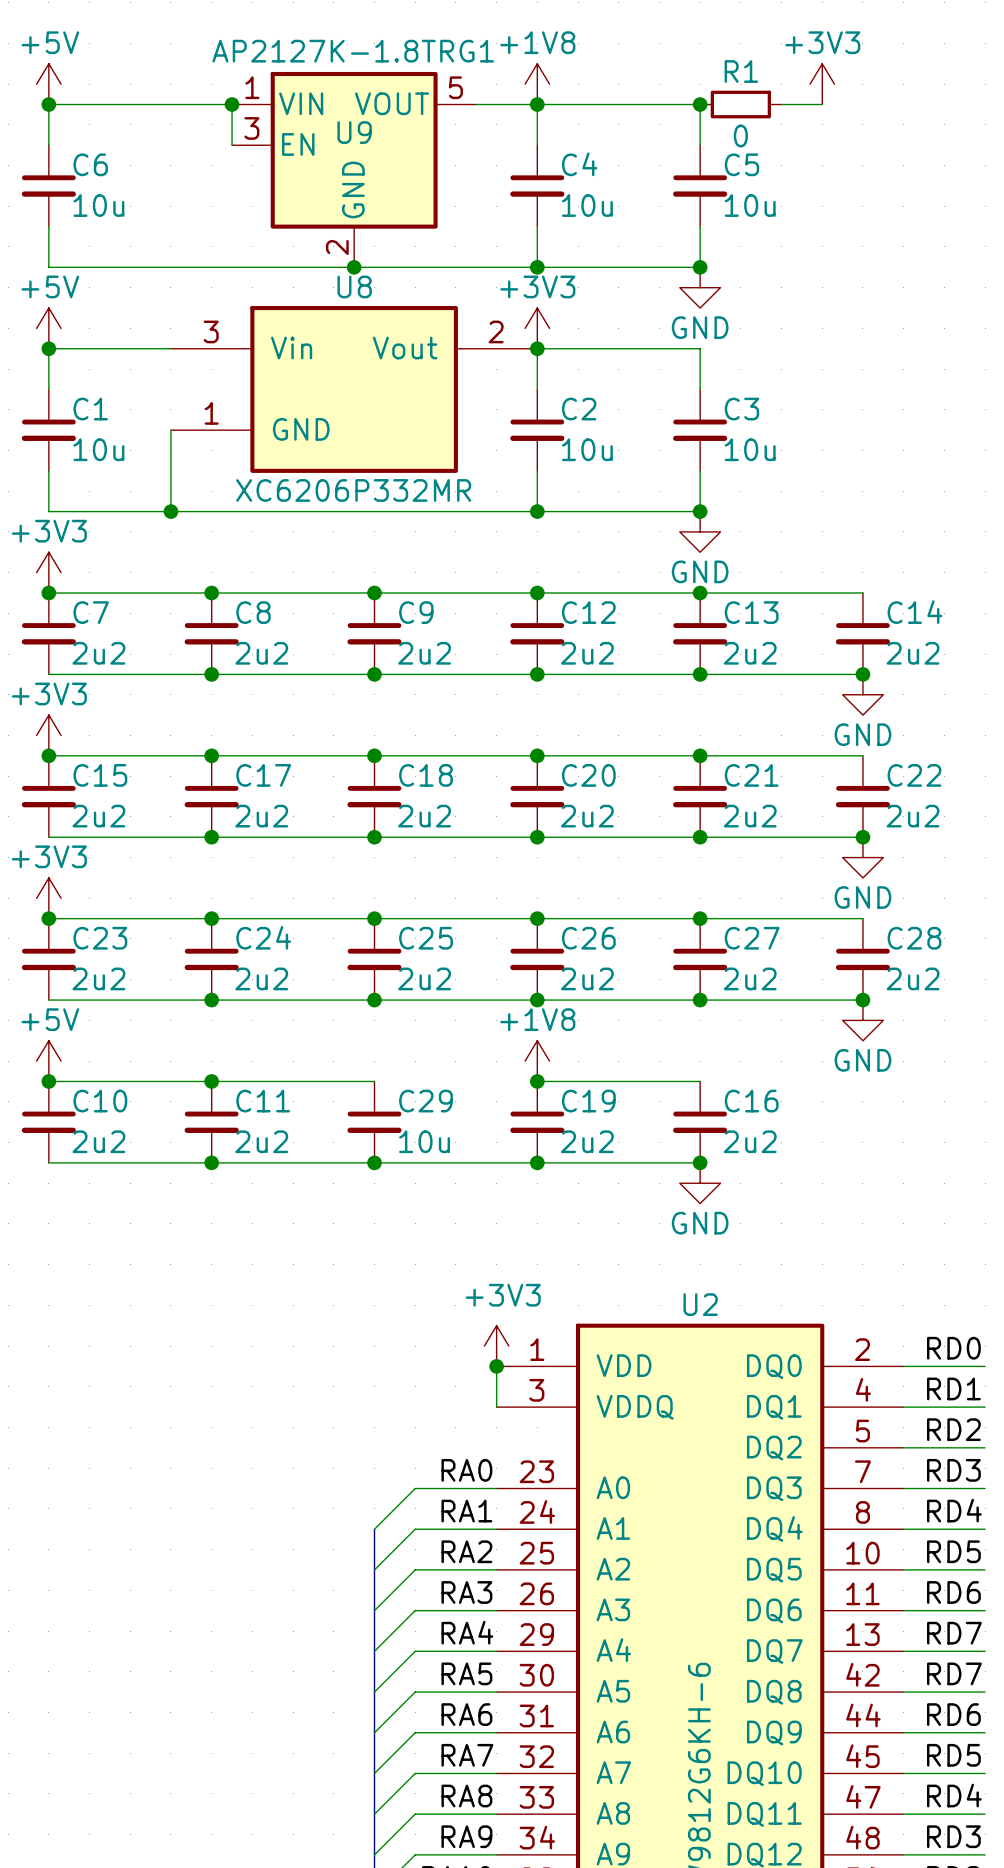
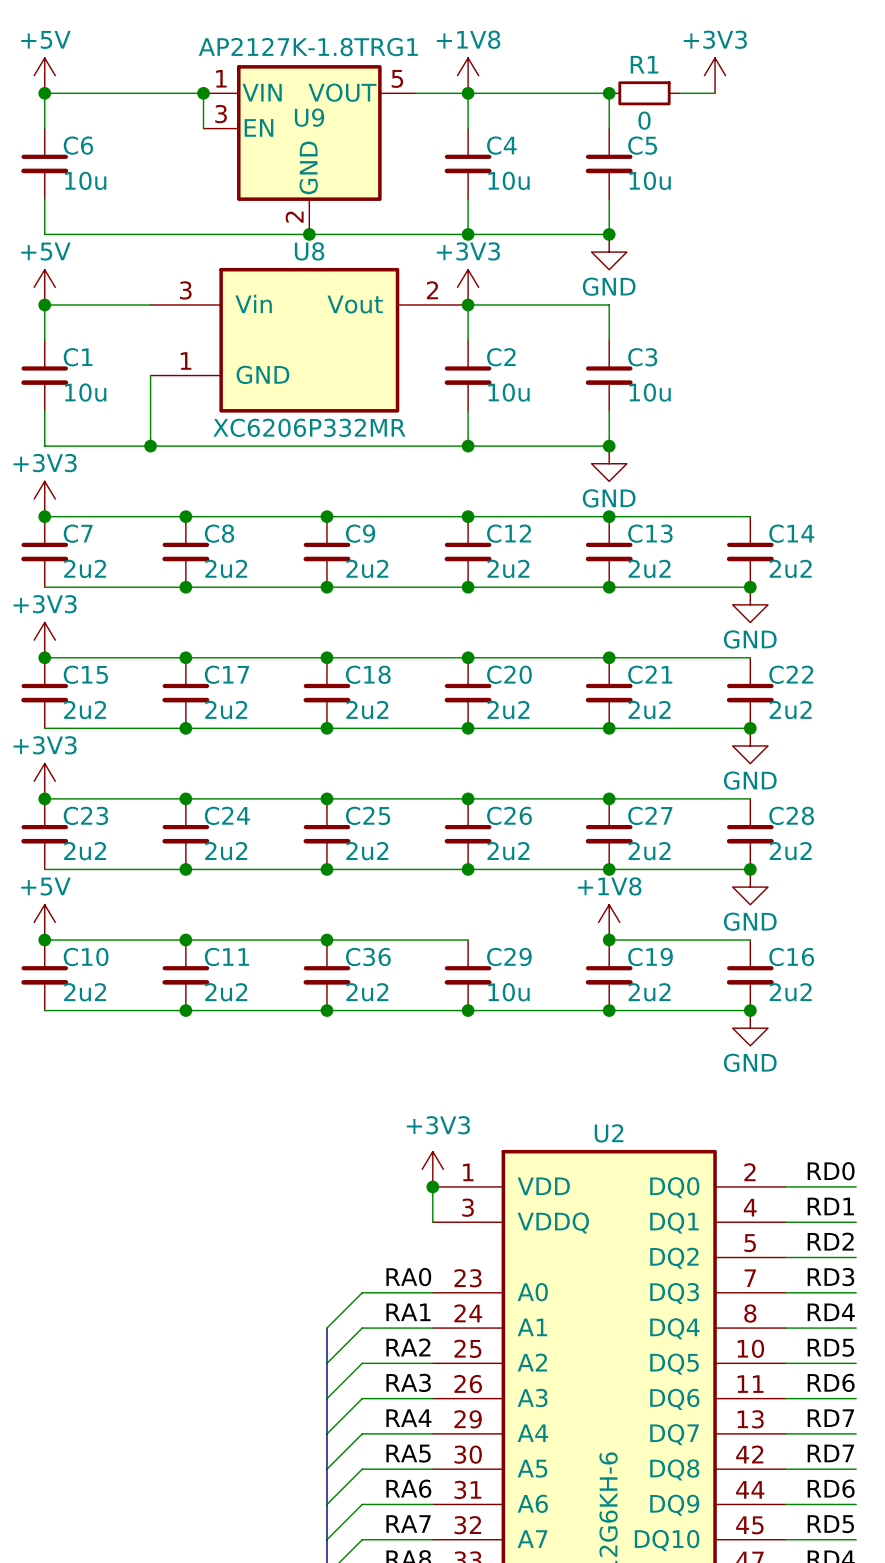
power symbol position: +1V8 (537, 1061) -> +1V8 (609, 922)
junction: none -> (326, 940)
wire: (537, 1081) (700, 1081) -> (468, 940) (326, 940)
junction: (537, 1081) -> none
wire: none -> (609, 940) (750, 940)
junction: none -> (609, 940)
C29 name: C29 (426, 1101) -> C36 (368, 956)
C19 name: C19 (588, 1101) -> C29 (509, 956)
C16 name: C16 (751, 1101) -> C19 (650, 956)
C16: none -> 2u2 (750, 975)
C29 value: 10u (424, 1141) -> 2u2 (367, 992)
C19 value: 2u2 (587, 1141) -> 10u (509, 992)
wire: none -> (609, 1010) (750, 1010)
junction: none -> (750, 1010)
power symbol position: GND (700, 1183) -> GND (750, 1028)

